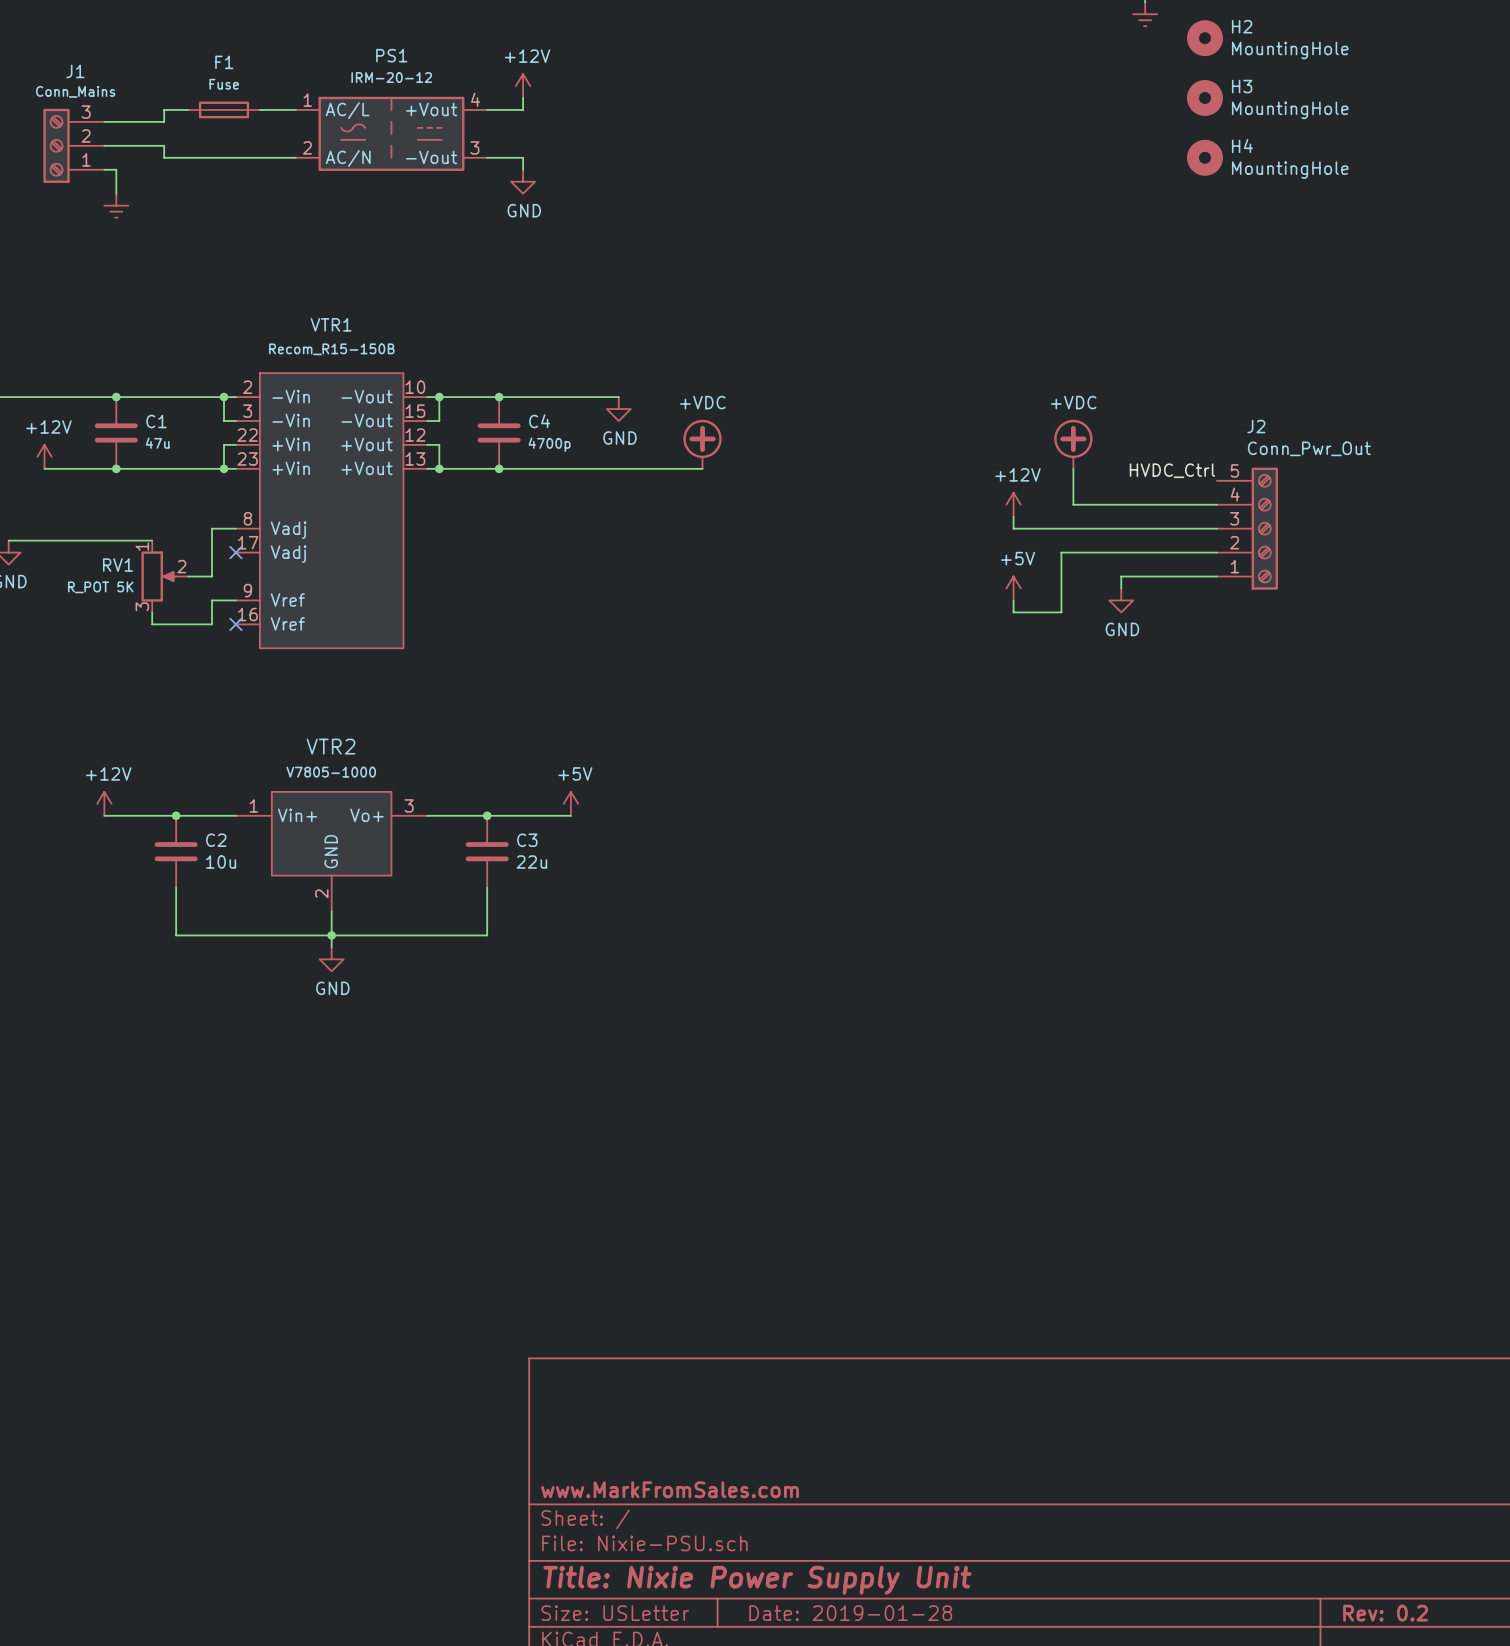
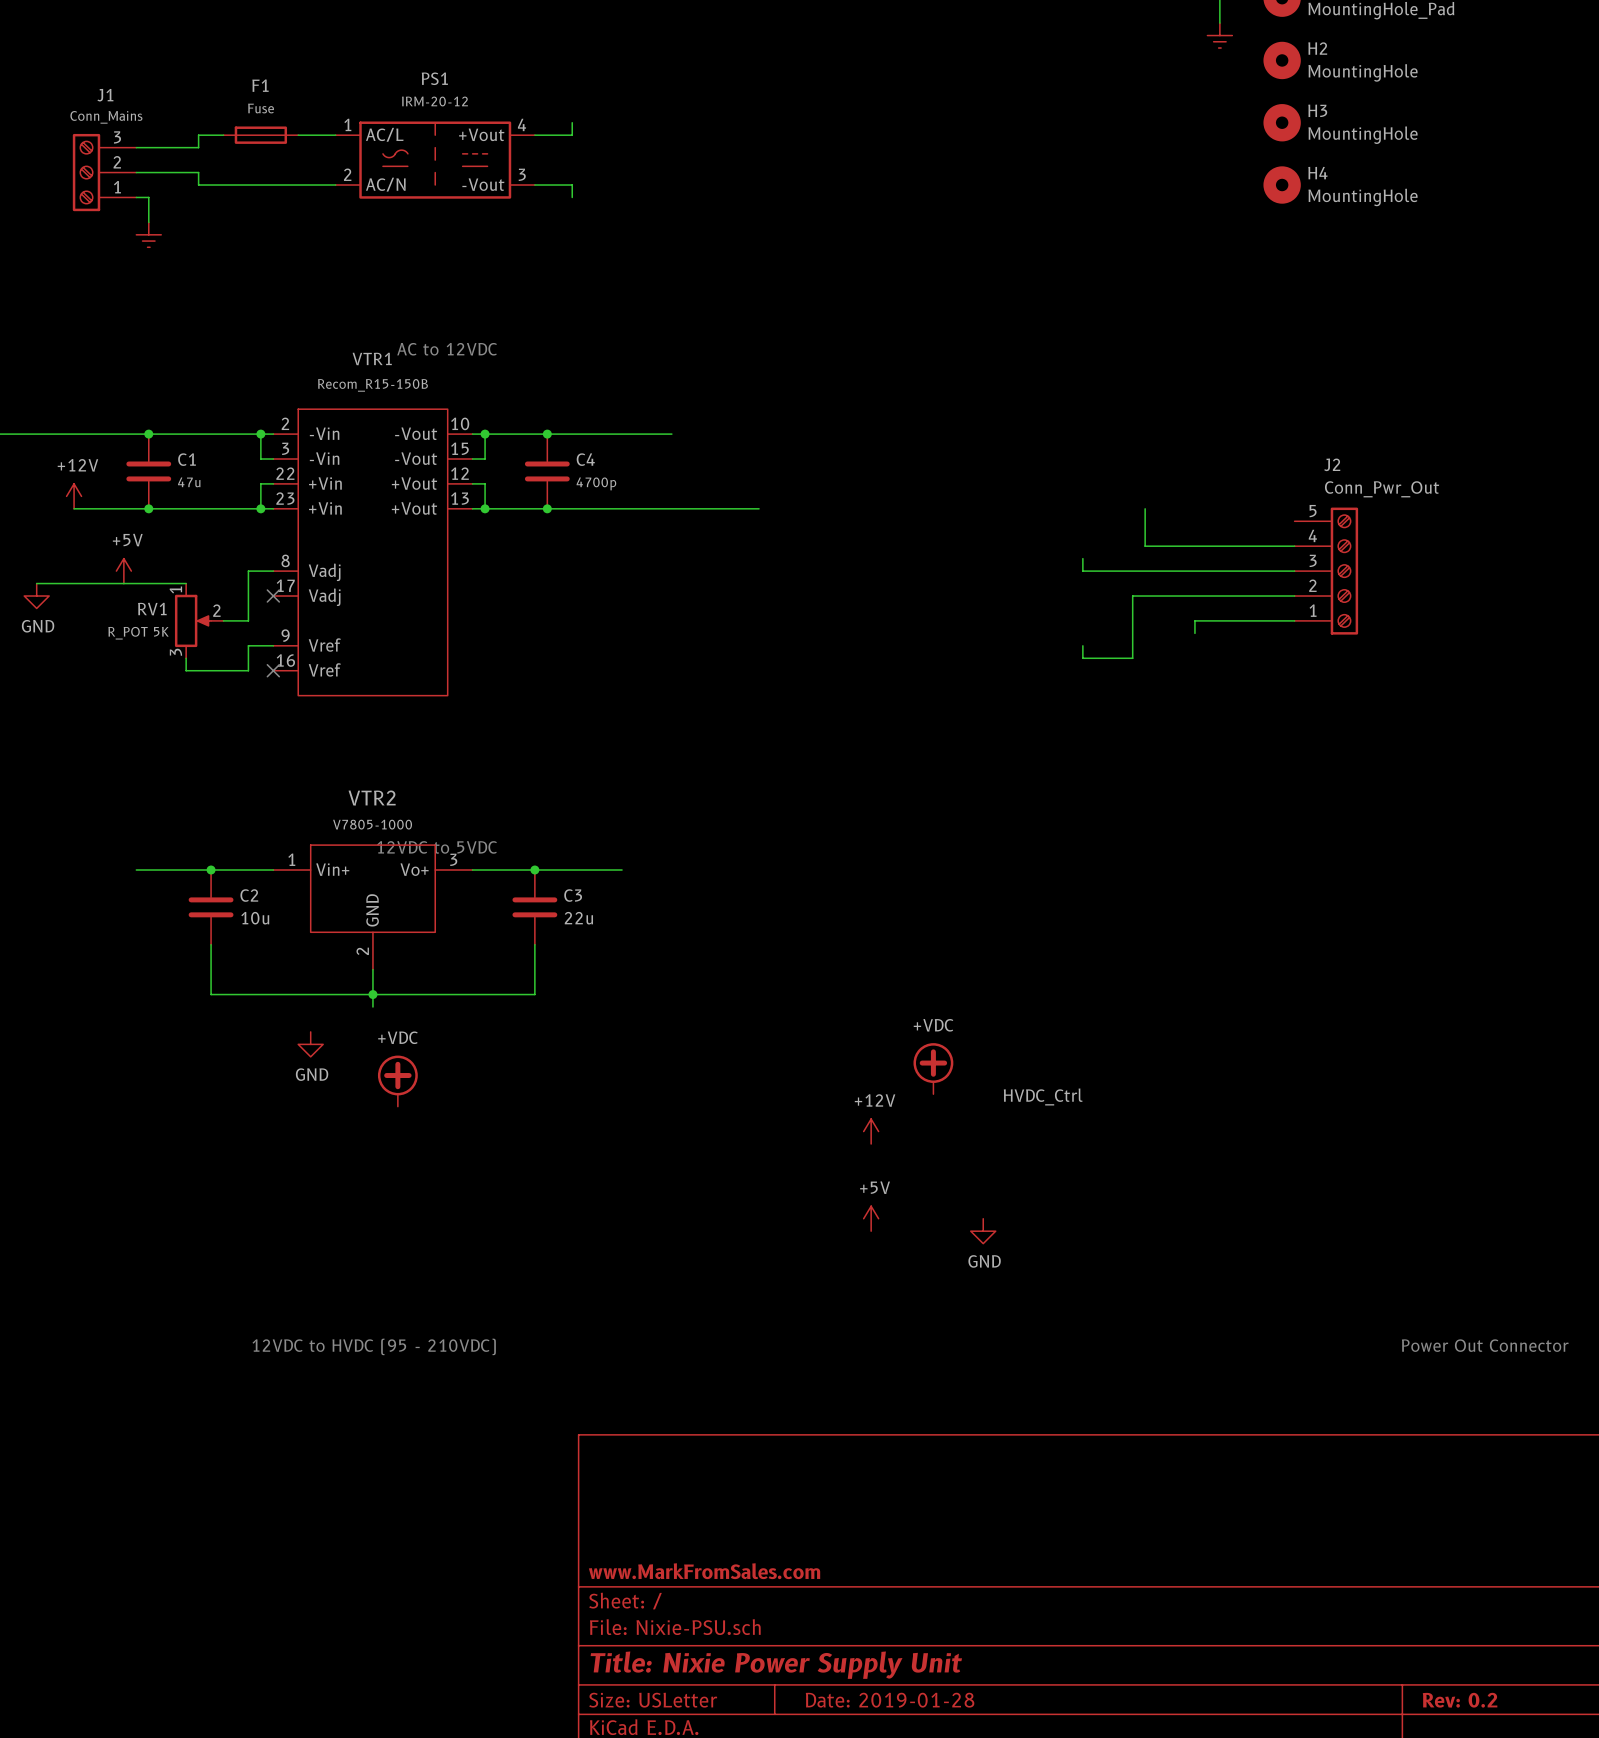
power symbol: +12V (523, 86) -> none
power symbol: GND (523, 181) -> none
text: none -> AC to 12VDC (447, 349)
power symbol: GND (618, 409) -> none
power symbol: +VDC (702, 444) -> none
power symbol: +VDC (1073, 444) -> none
label: HVDC_Ctrl (1172, 470) -> none
power symbol: +12V (1013, 504) -> none
power symbol: none -> +5V (123, 571)
power symbol: +5V (1013, 588) -> none
power symbol: GND (1121, 600) -> none
text: none -> 12VDC to 5VDC (436, 847)
power symbol: +12V (104, 803) -> none
power symbol: +5V (570, 803) -> none
power symbol position: GND (331, 959) -> GND (310, 1044)
power symbol: none -> +VDC (933, 1068)
power symbol: none -> +VDC (397, 1081)
label: none -> HVDC_Ctrl (1043, 1096)
power symbol: none -> +12V (871, 1131)
power symbol: none -> +5V (871, 1218)
power symbol: none -> GND (983, 1231)
text: none -> Power Out Connector (1485, 1345)
text: none -> 12VDC to HVDC (95 - 210VDC) (374, 1346)

